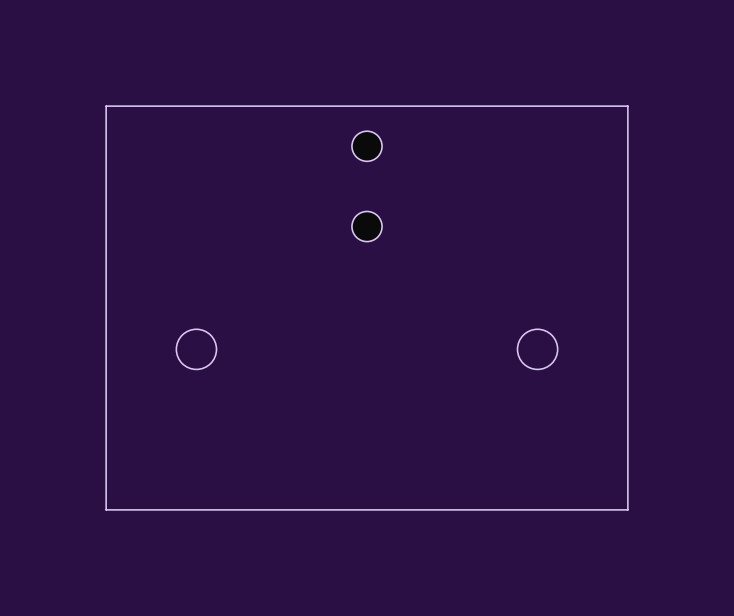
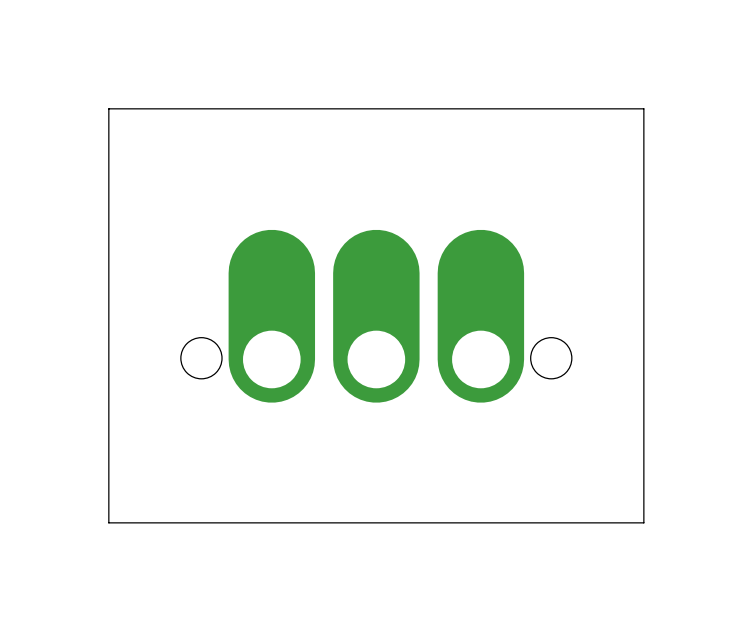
part: (367, 186) -> none
part: none -> (376, 316)

